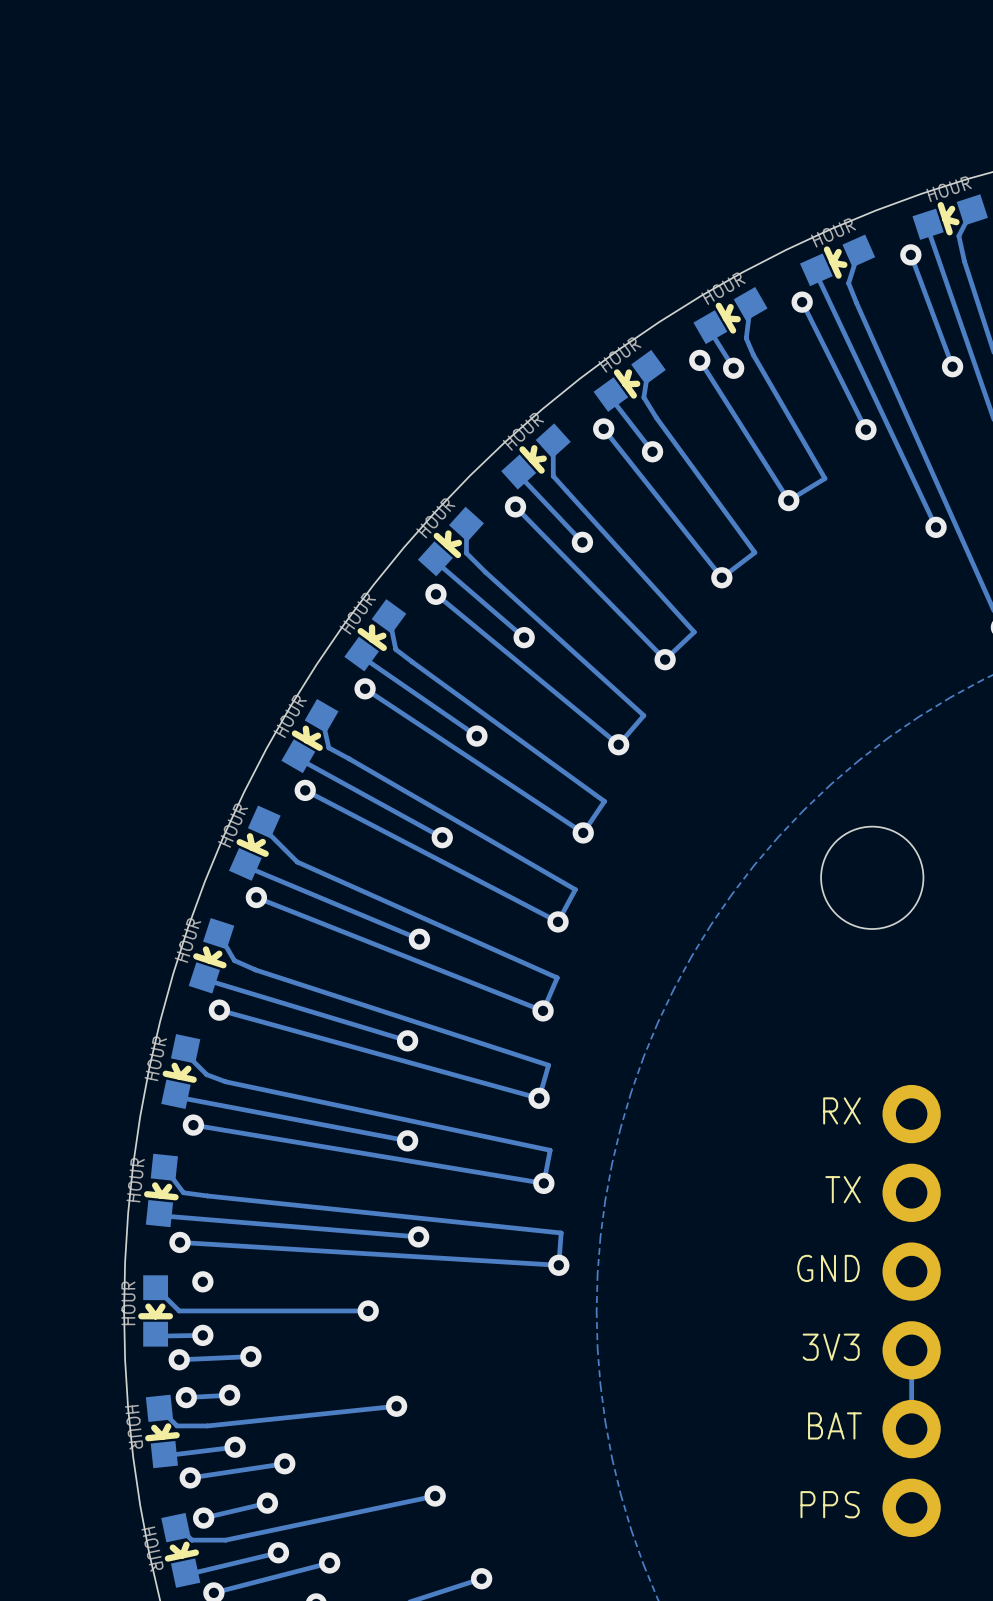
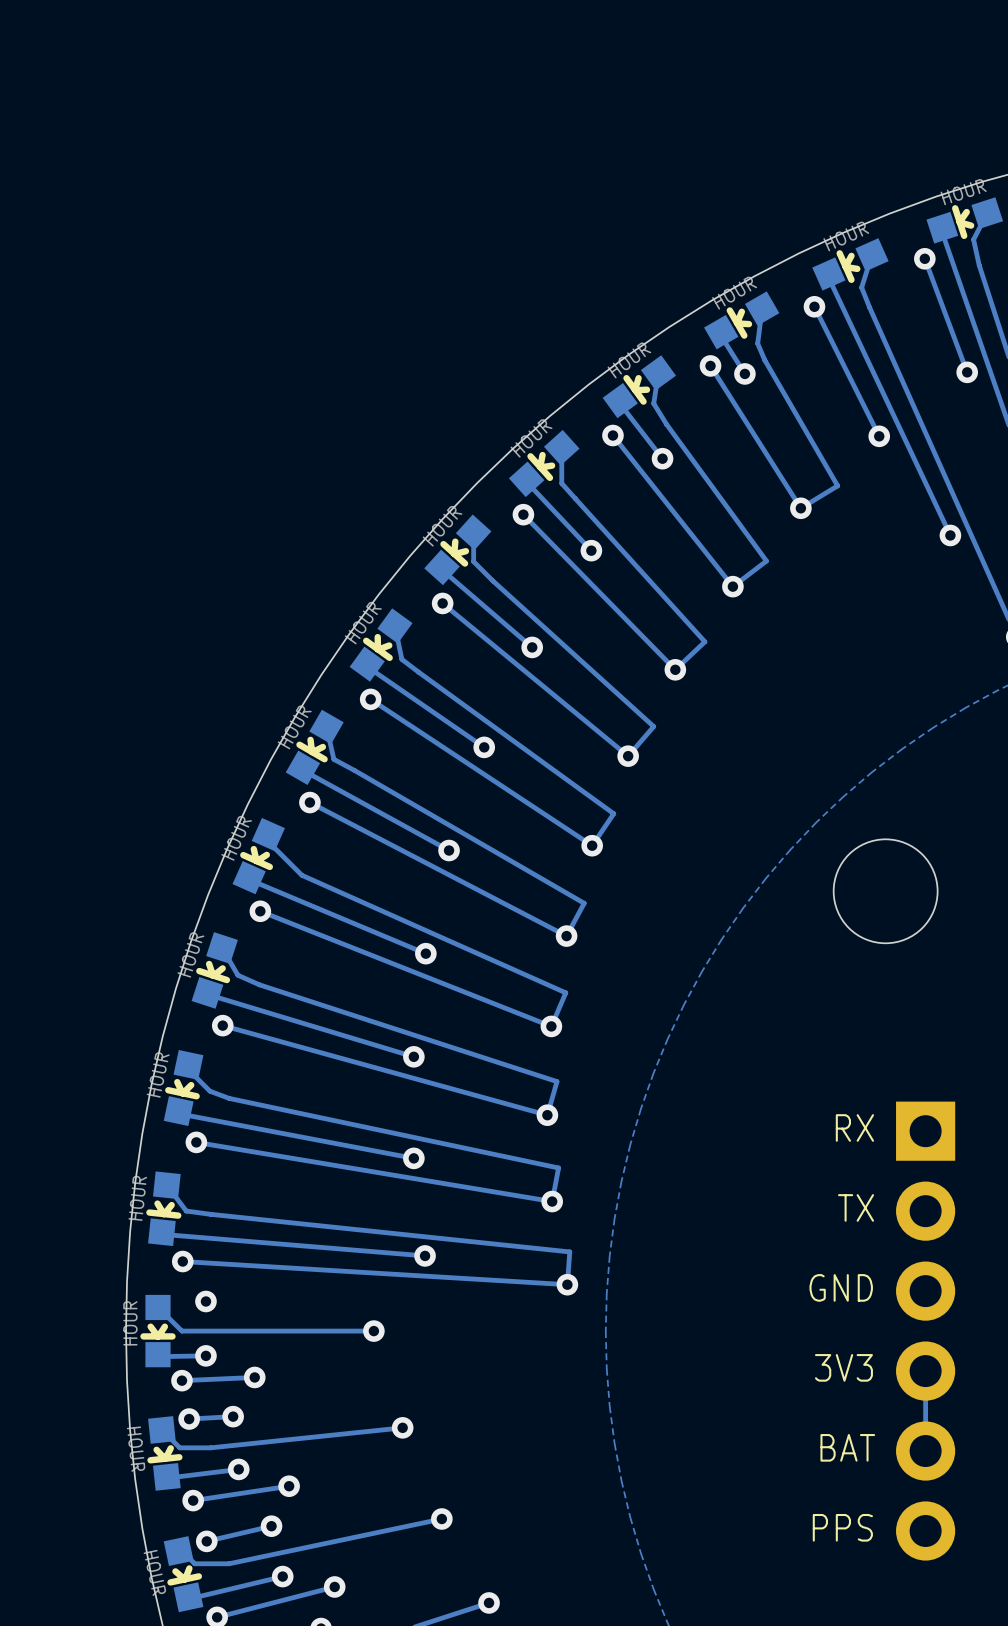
part: none -> (925, 1251)
part: (911, 1310) -> none

